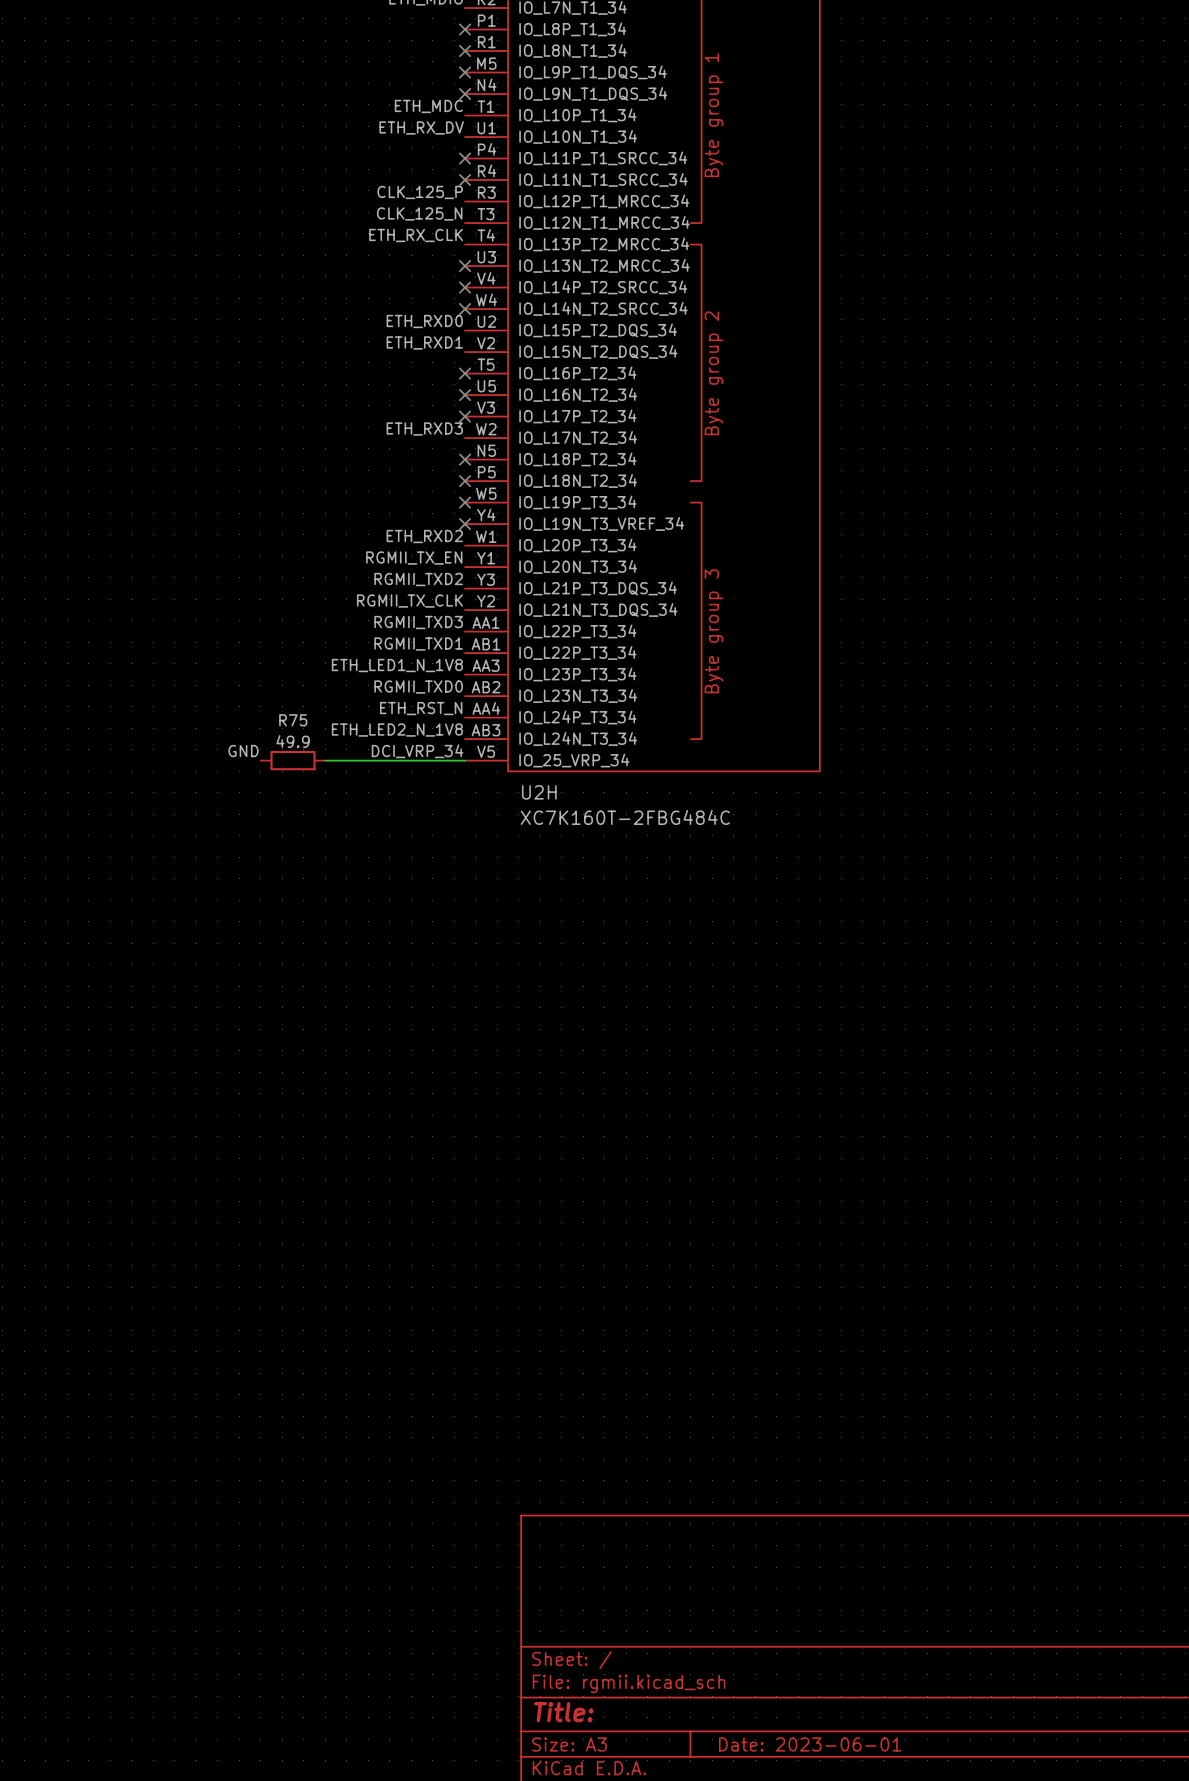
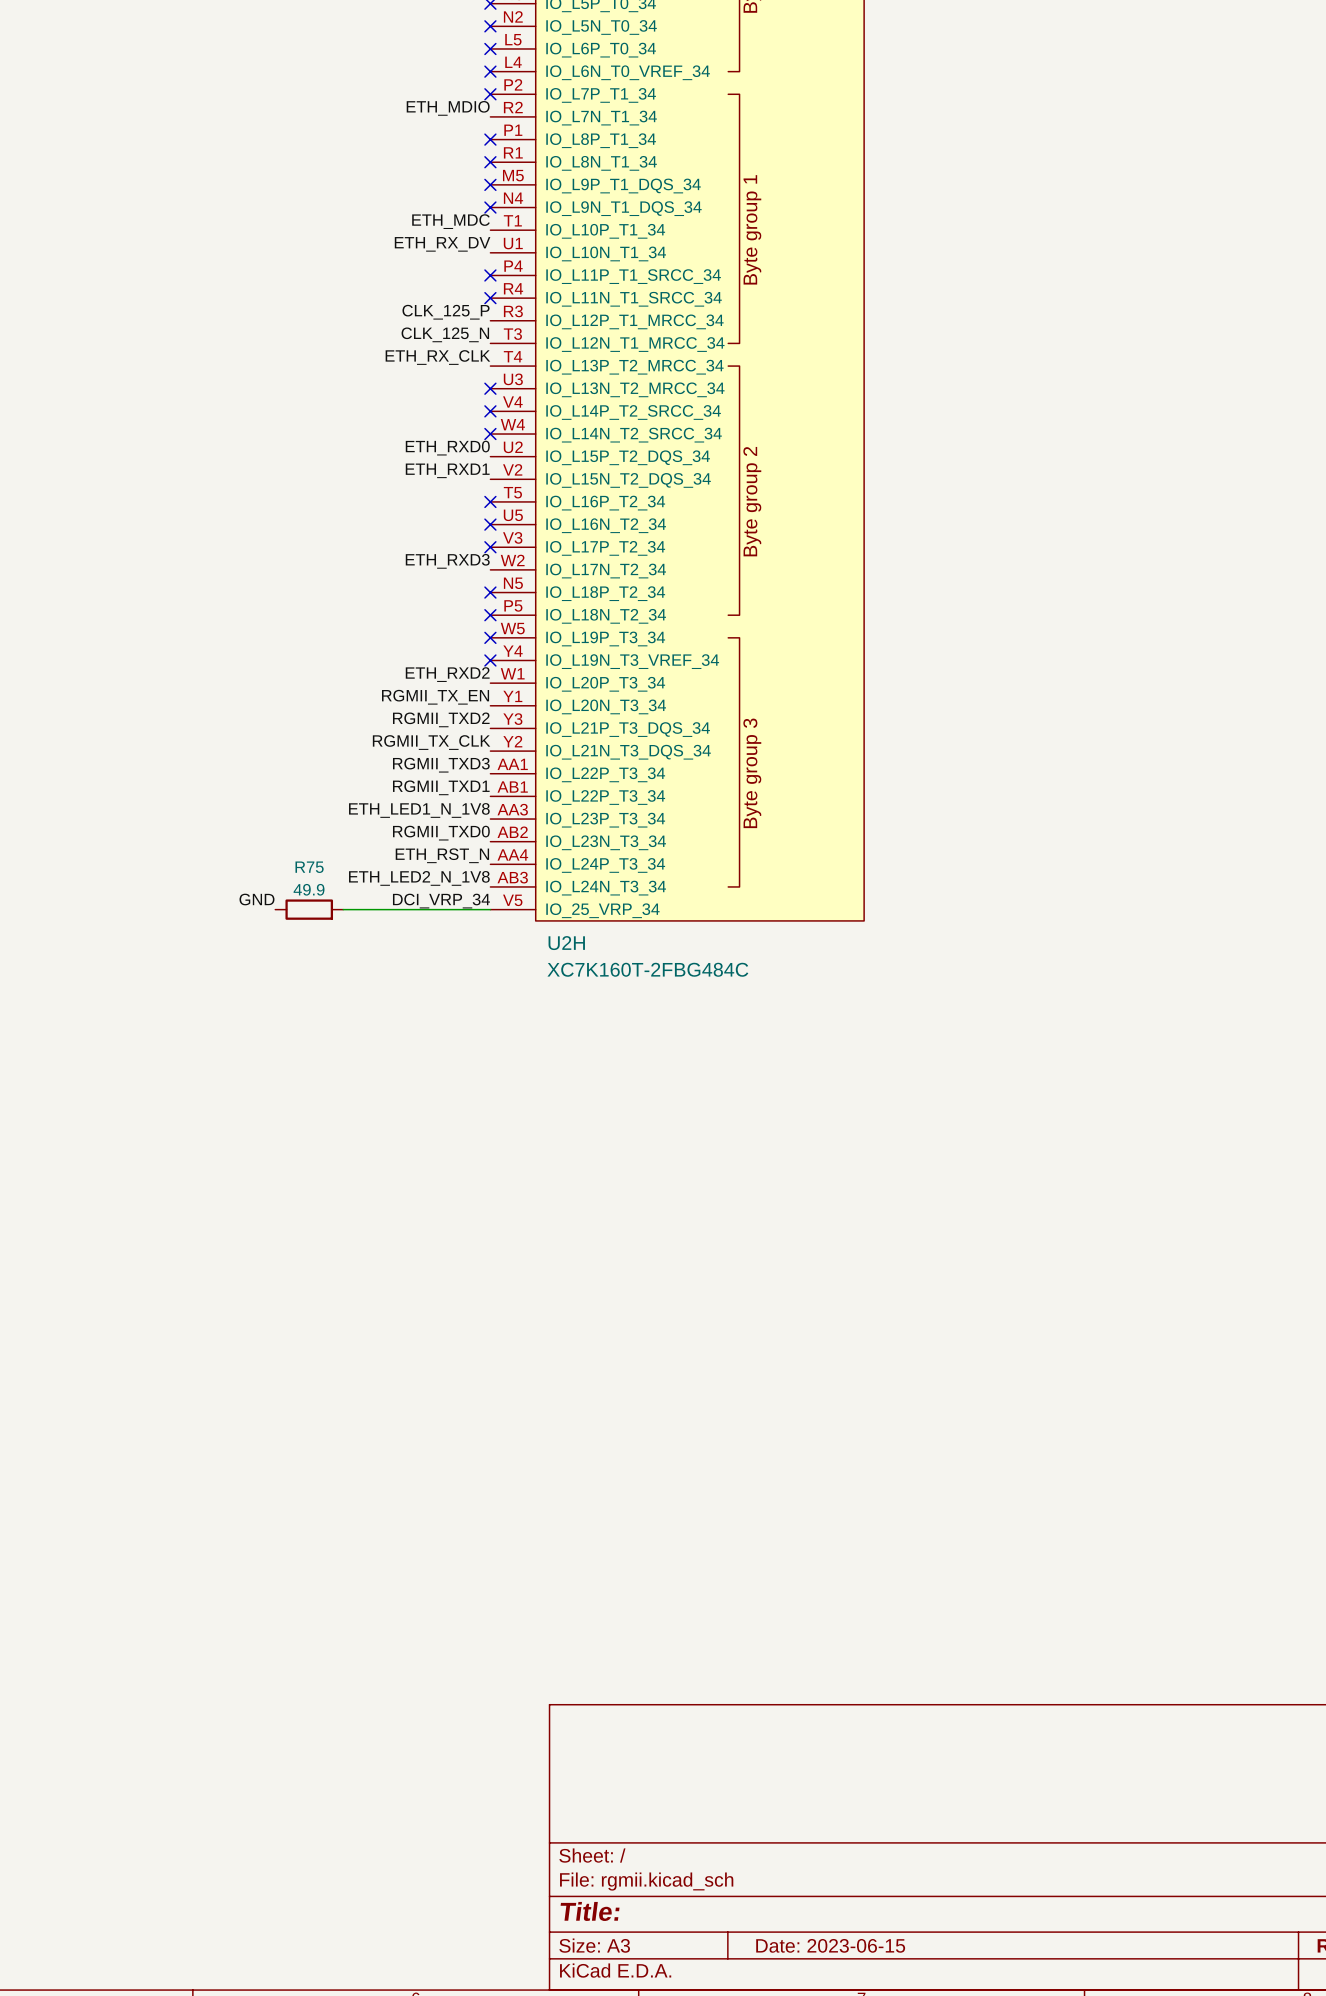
title block: Date: 2023-06-01 (810, 1744) -> Date: 2023-06-15 (830, 1945)

